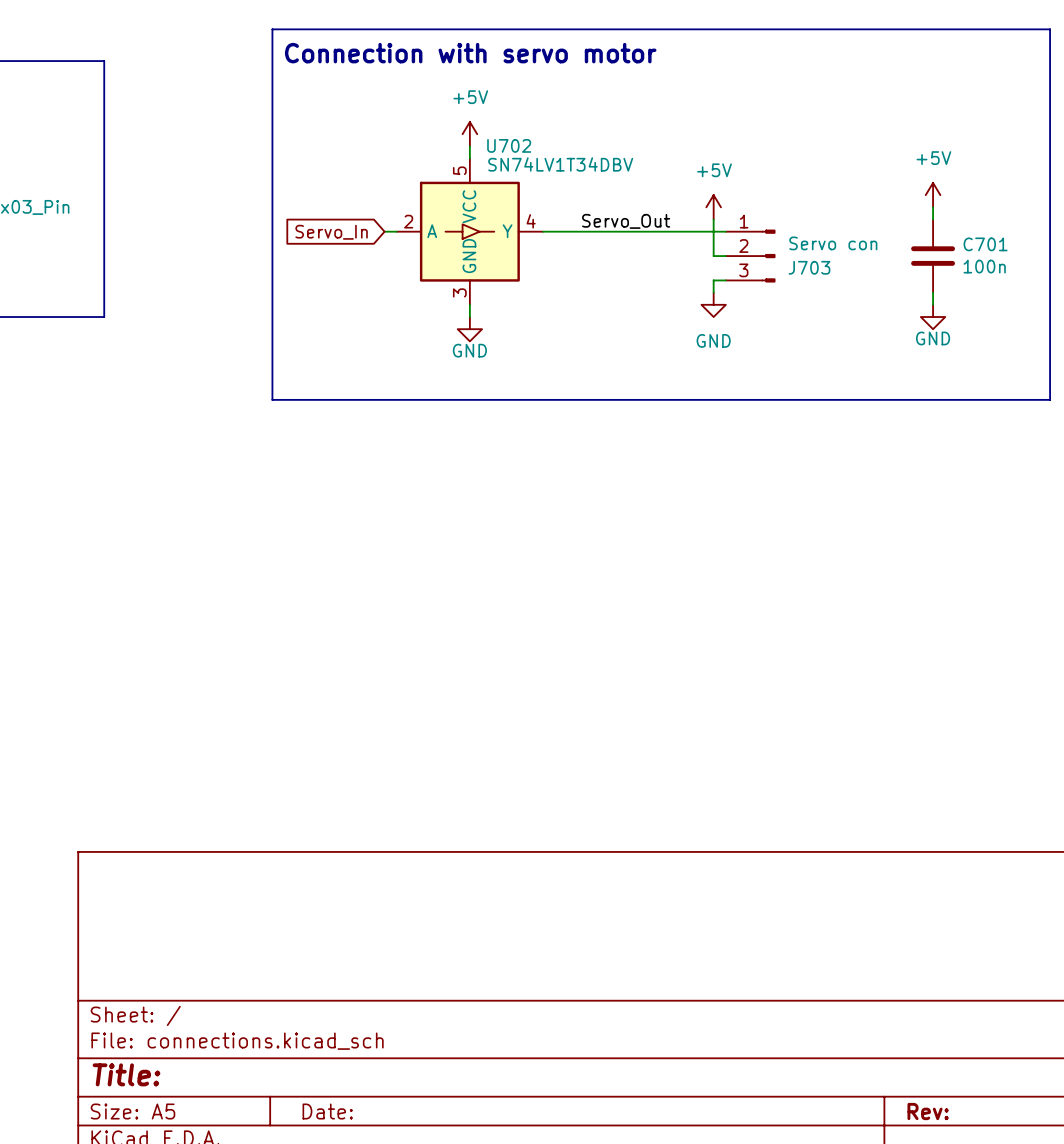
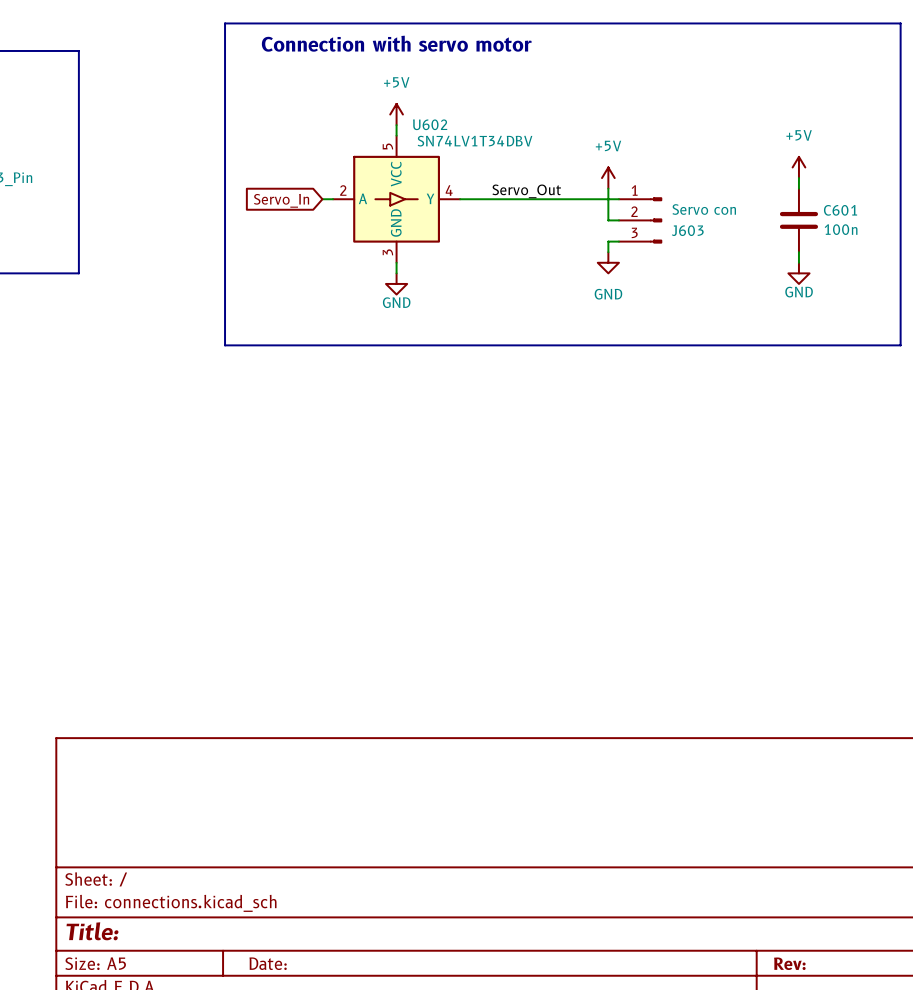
U702 name: U702 (509, 145) -> U602 (430, 124)
C701 name: C701 (985, 244) -> C601 (840, 210)
J703 name: J703 (809, 267) -> J603 (687, 230)

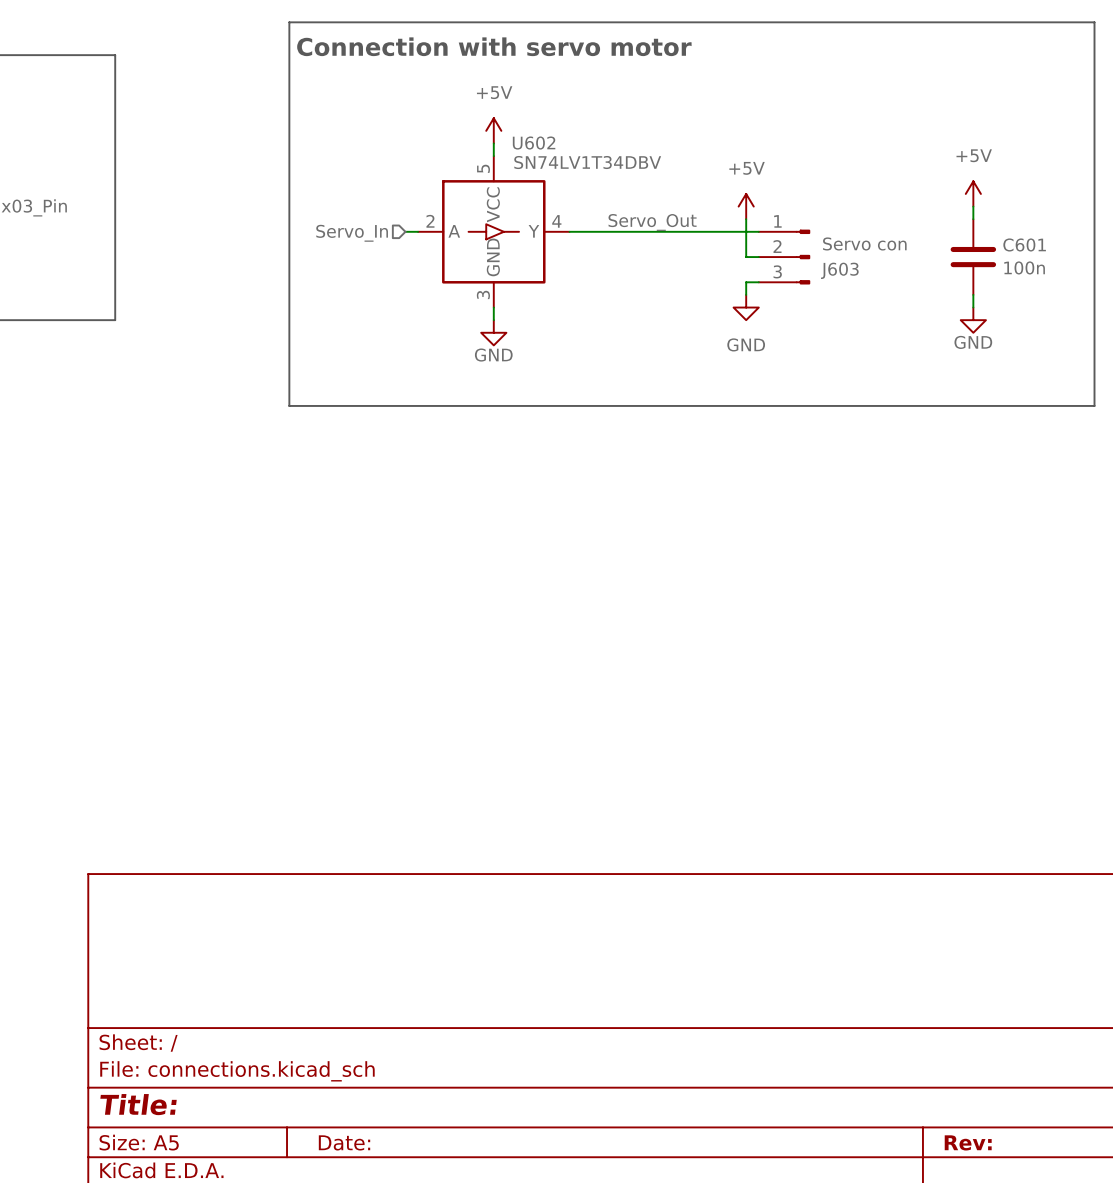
hierarchical label: none -> Servo_In (352, 233)
global label: Servo_In (281, 200) -> none

